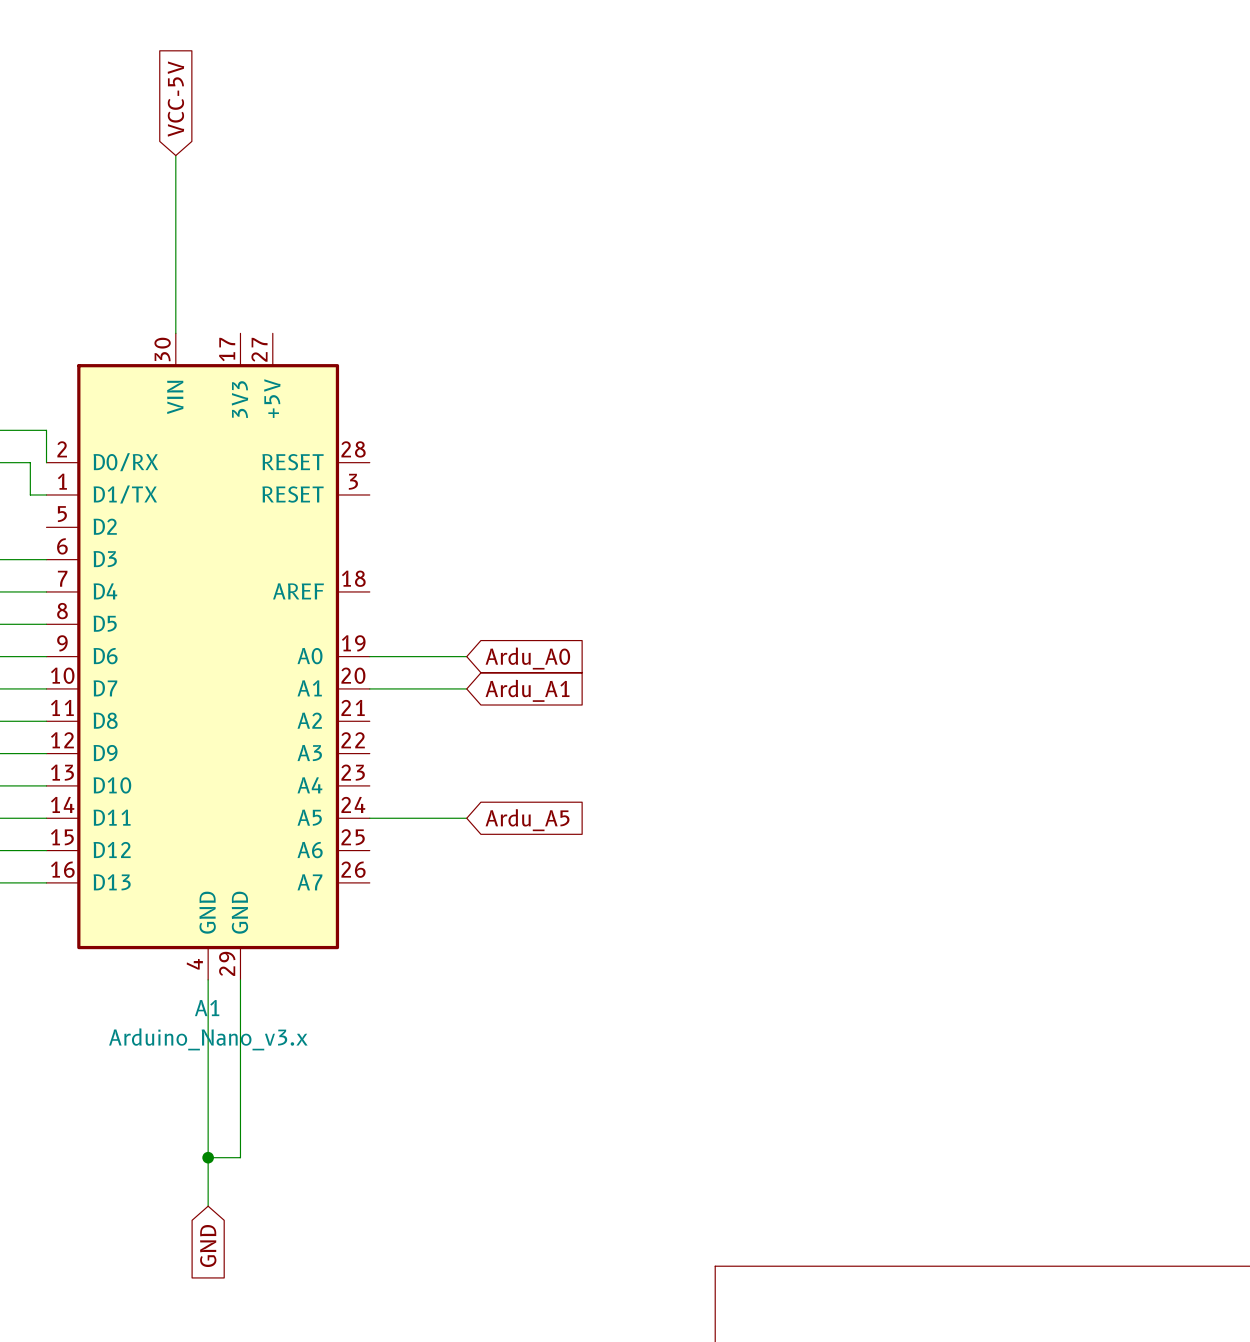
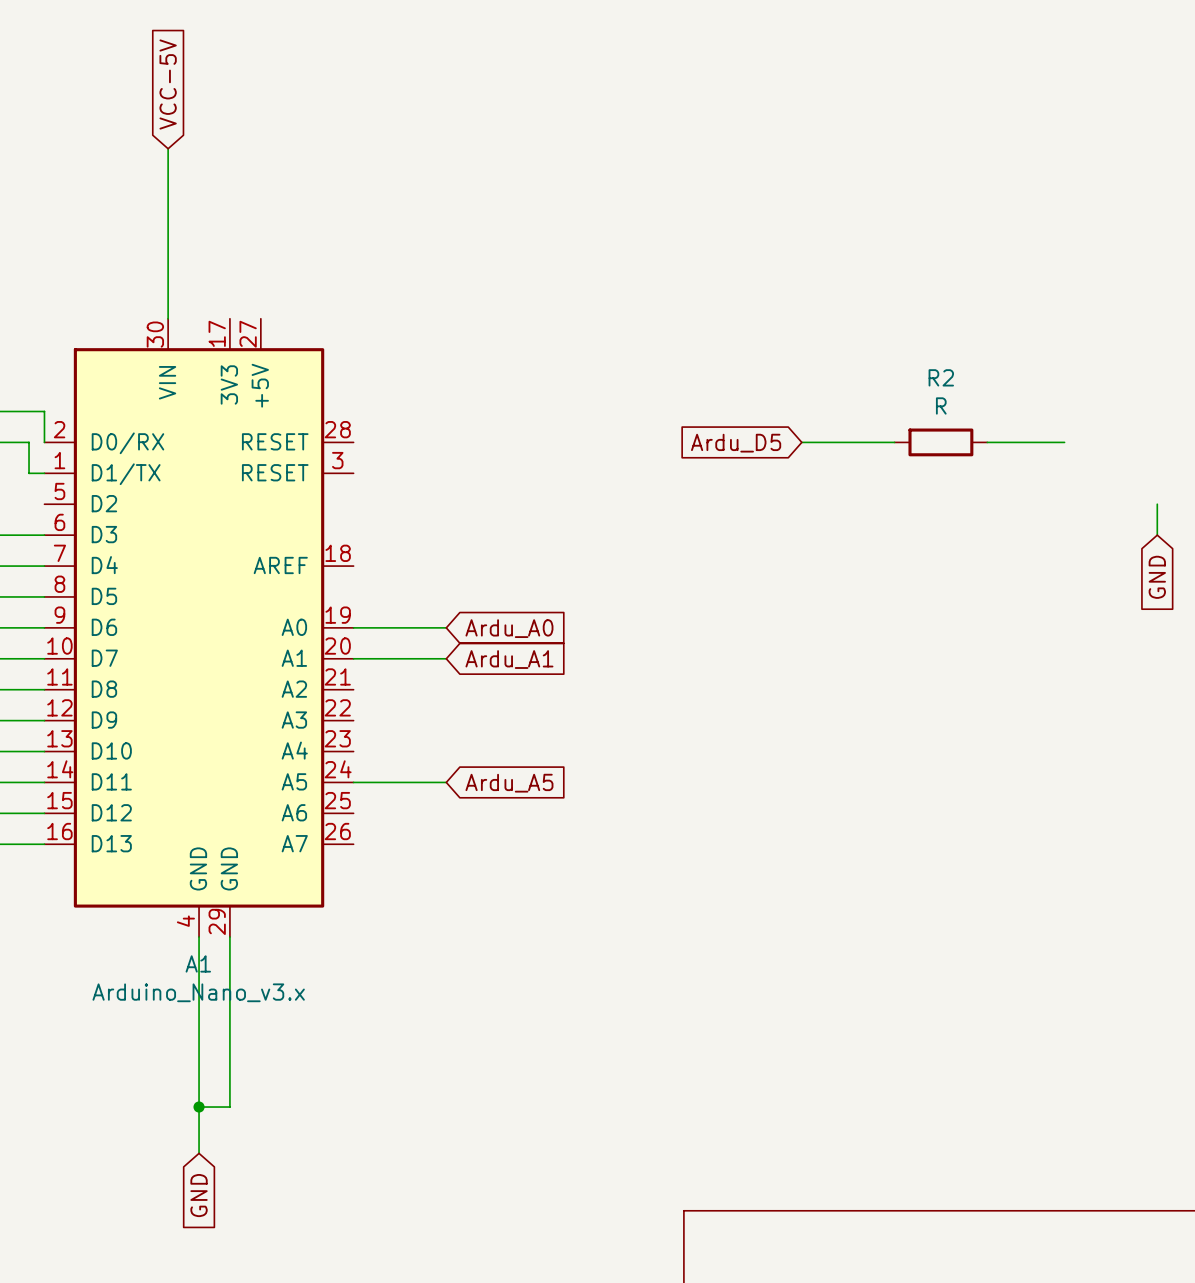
wire: none -> (801, 442) (894, 442)
R2: none -> R (940, 442)
wire: none -> (987, 442) (1064, 442)
global label: none -> Ardu_D5 (736, 443)
wire: none -> (1157, 504) (1157, 535)
global label: none -> GND (1157, 577)

